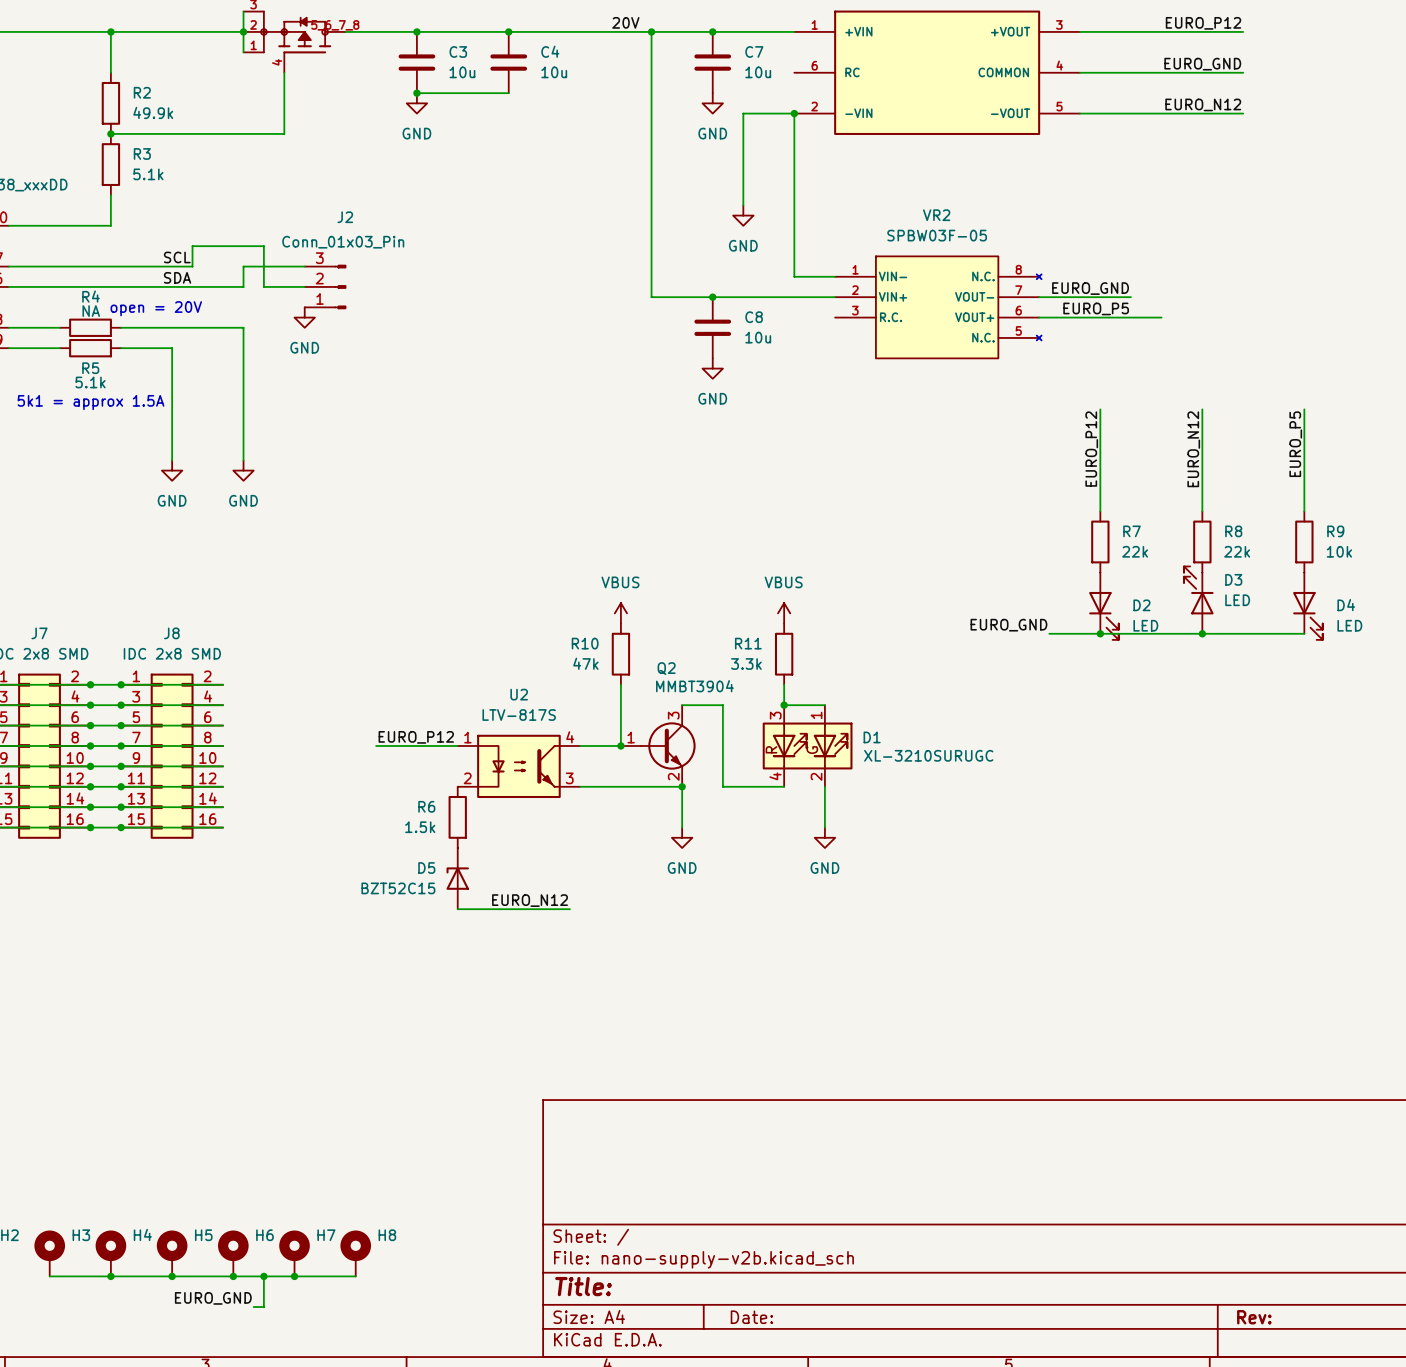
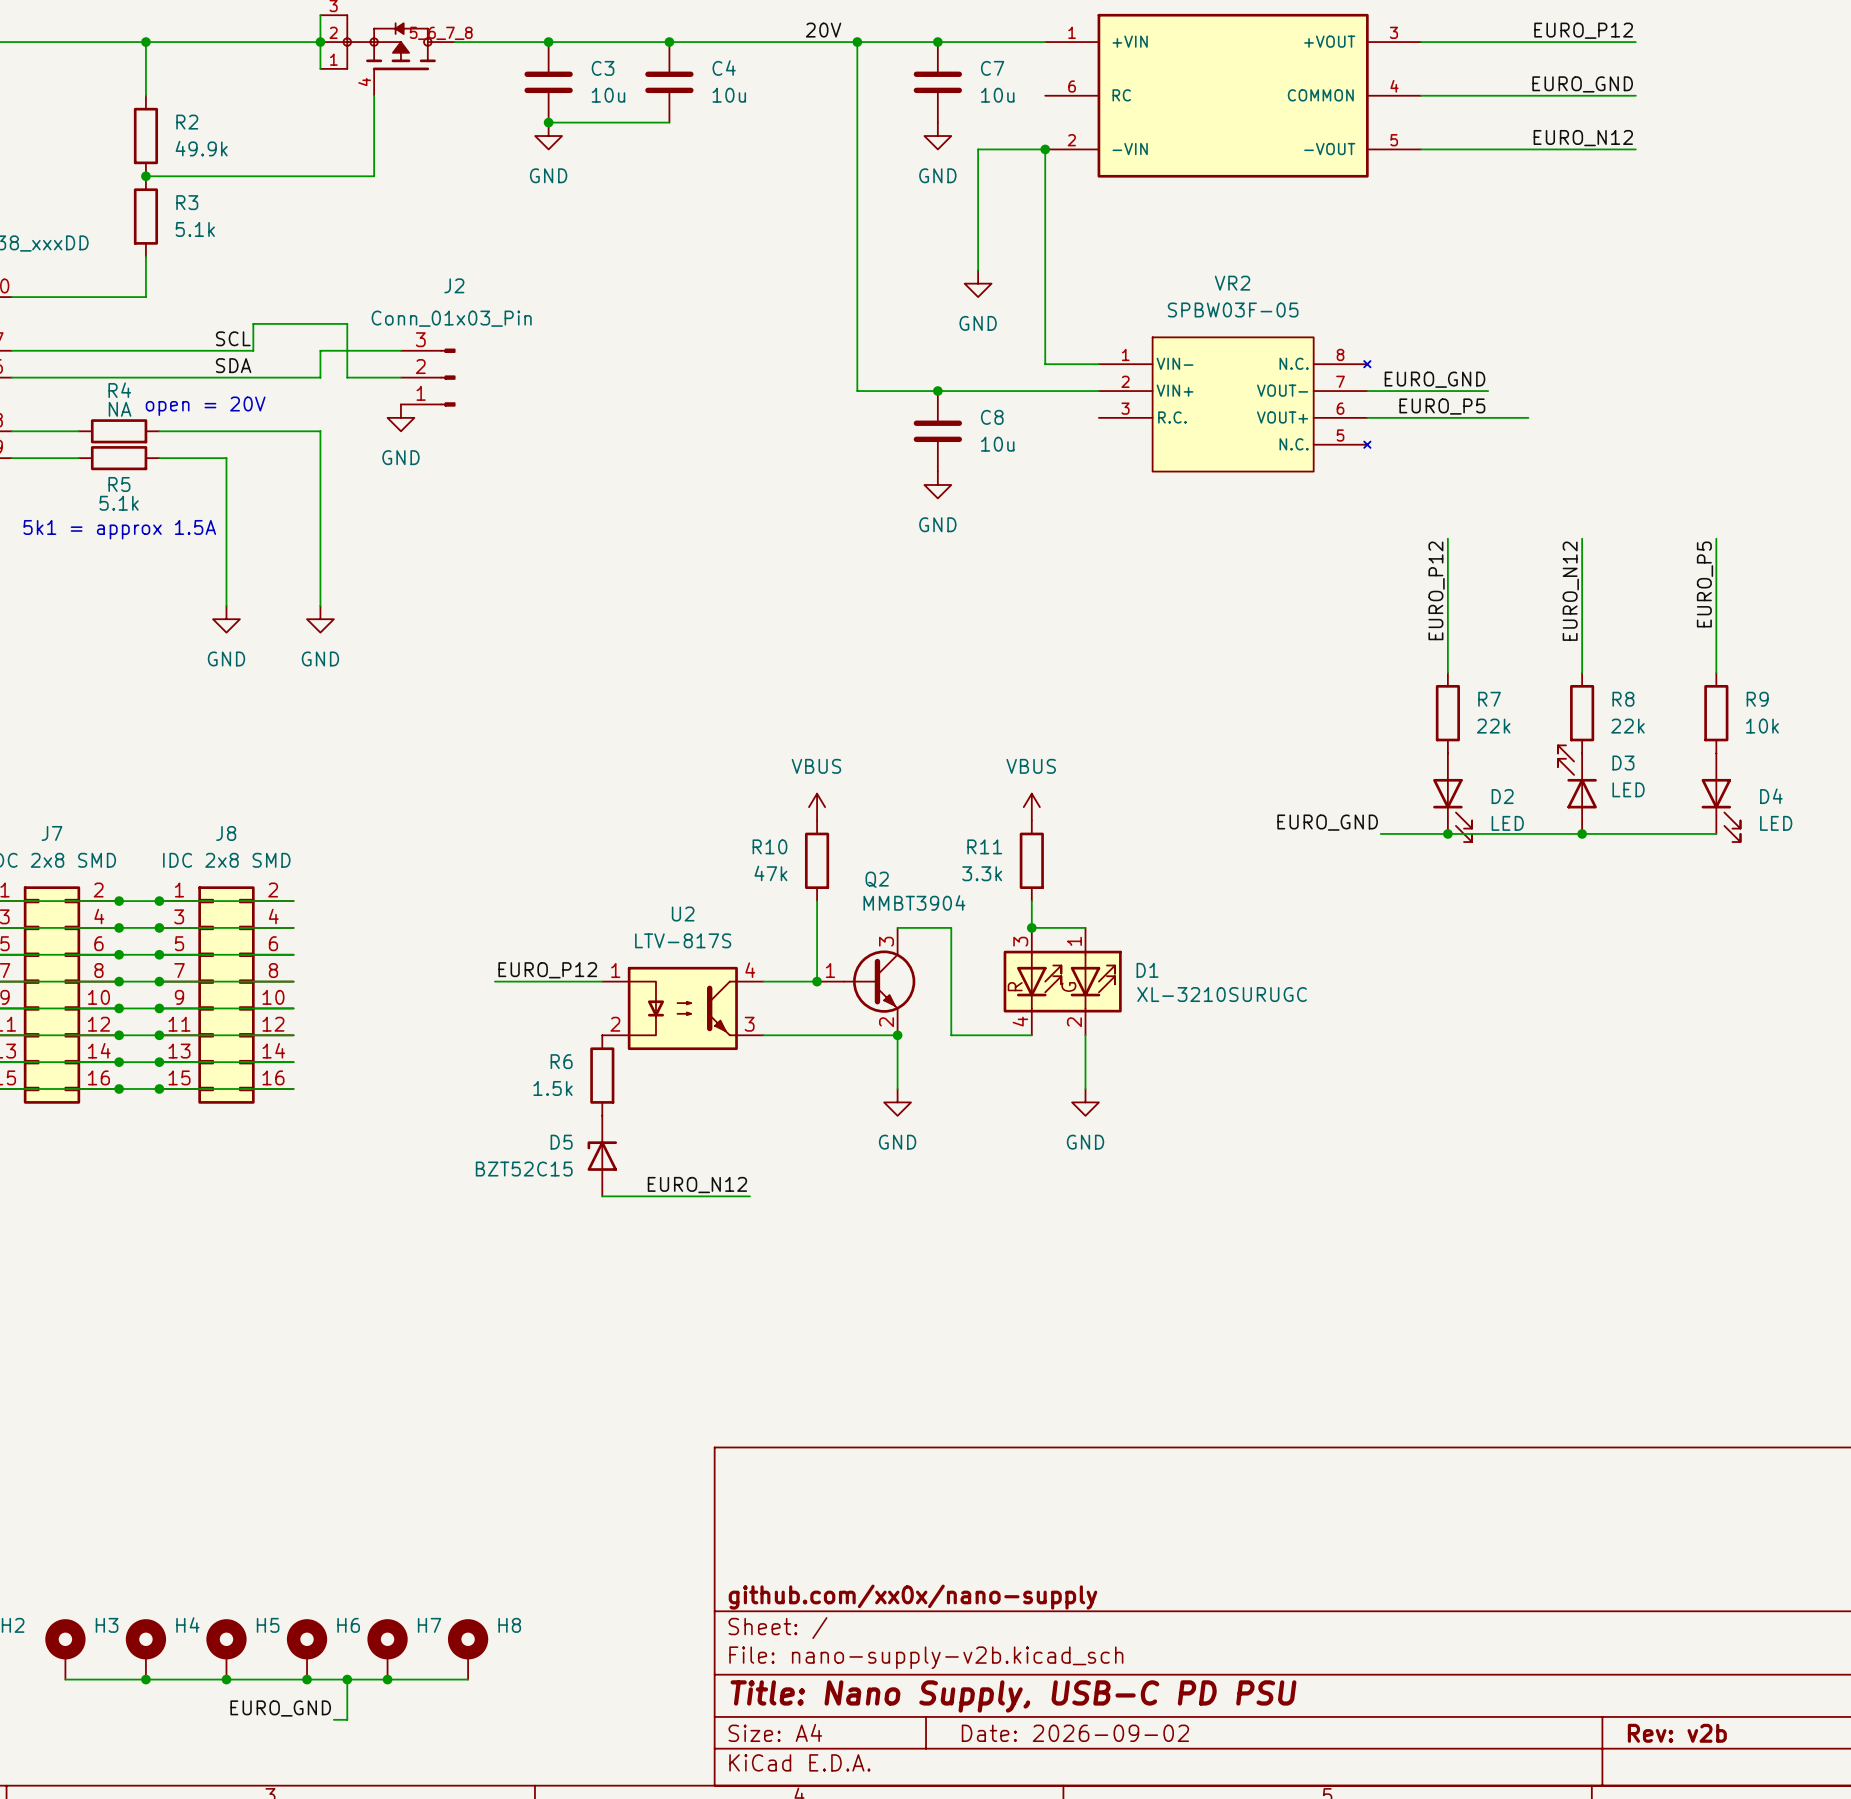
title block: none -> github.com/xx0x/nano-supply (913, 1597)
title block: Title: (583, 1286) -> Title: Nano Supply, USB-C PD PSU (1013, 1696)
title block: Date: (751, 1317) -> Date: 2026-09-02 (1075, 1733)
title block: Rev: (1254, 1317) -> Rev: v2b (1677, 1733)

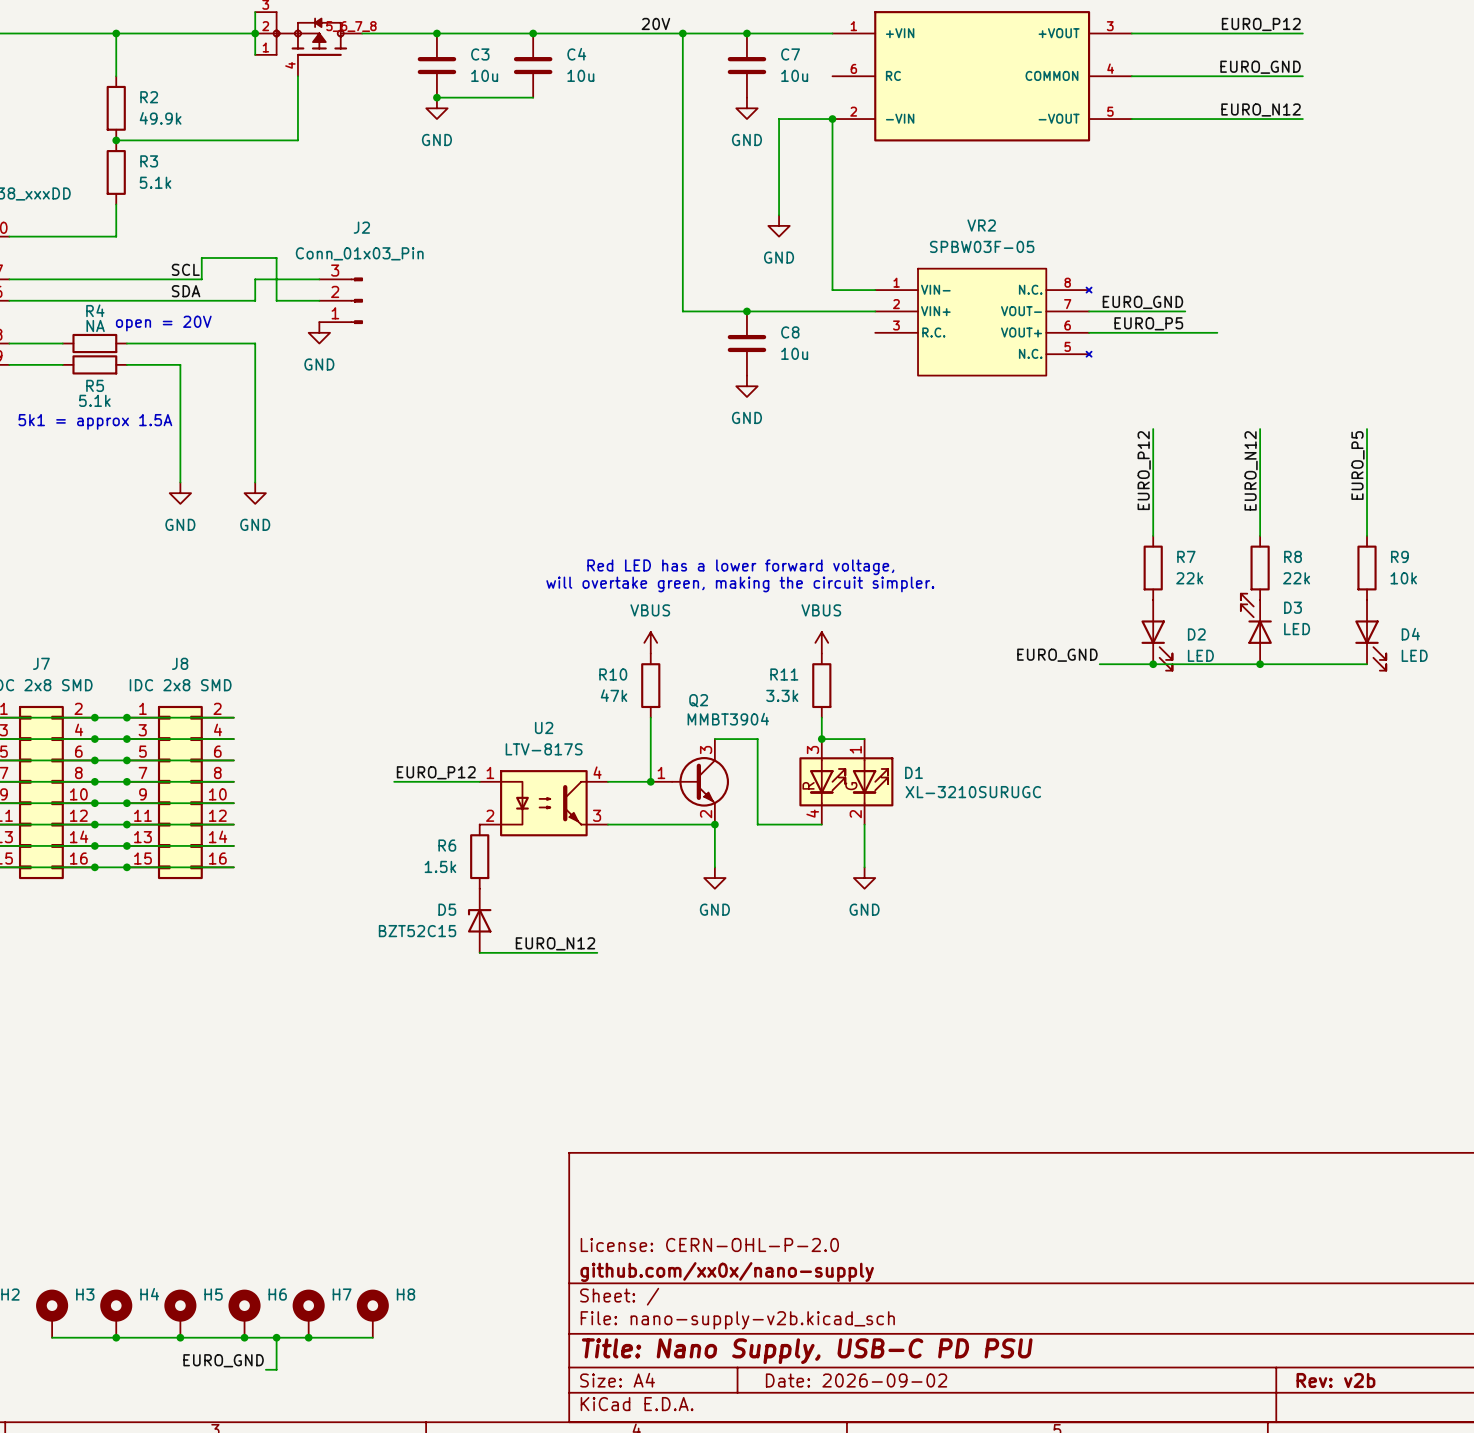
text: none -> Red LED has a lower forward voltage, (740, 567)
text: none -> will overtake green, making the circuit simpler. (740, 584)
title block: none -> License: CERN-OHL-P-2.0 (709, 1244)

